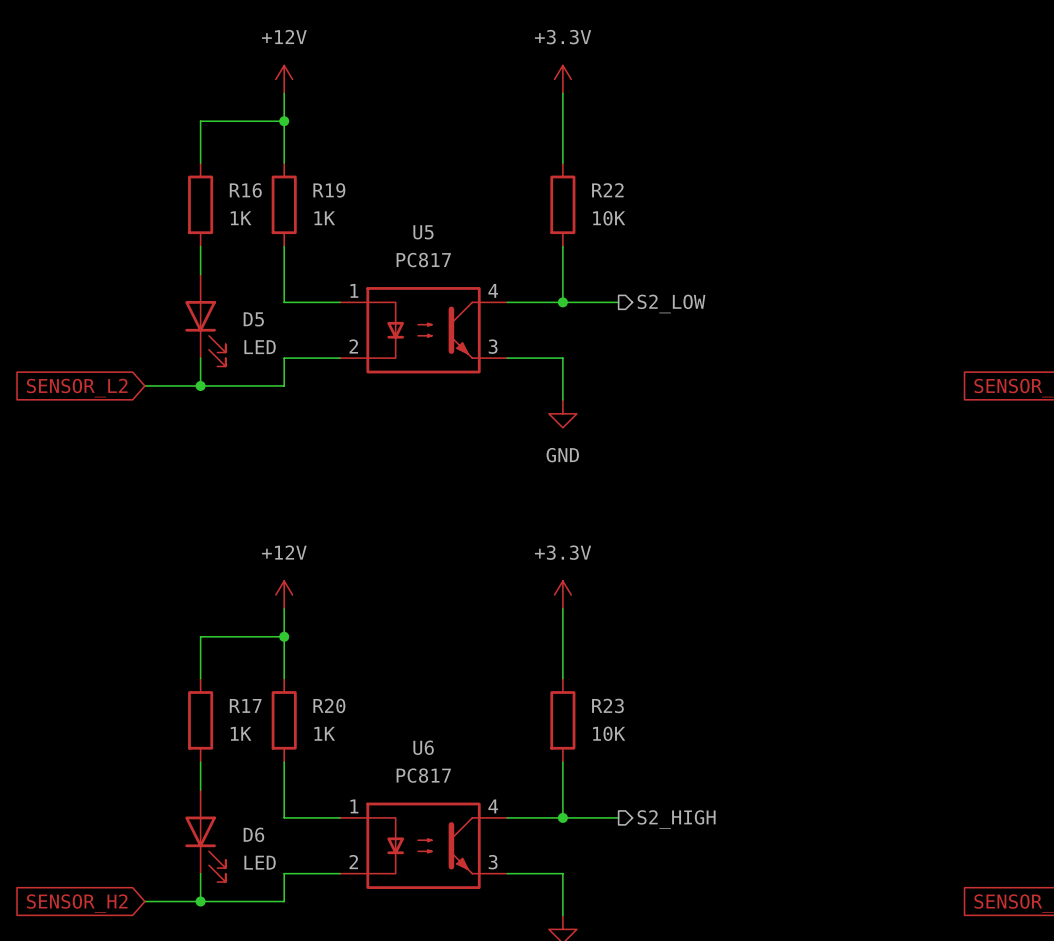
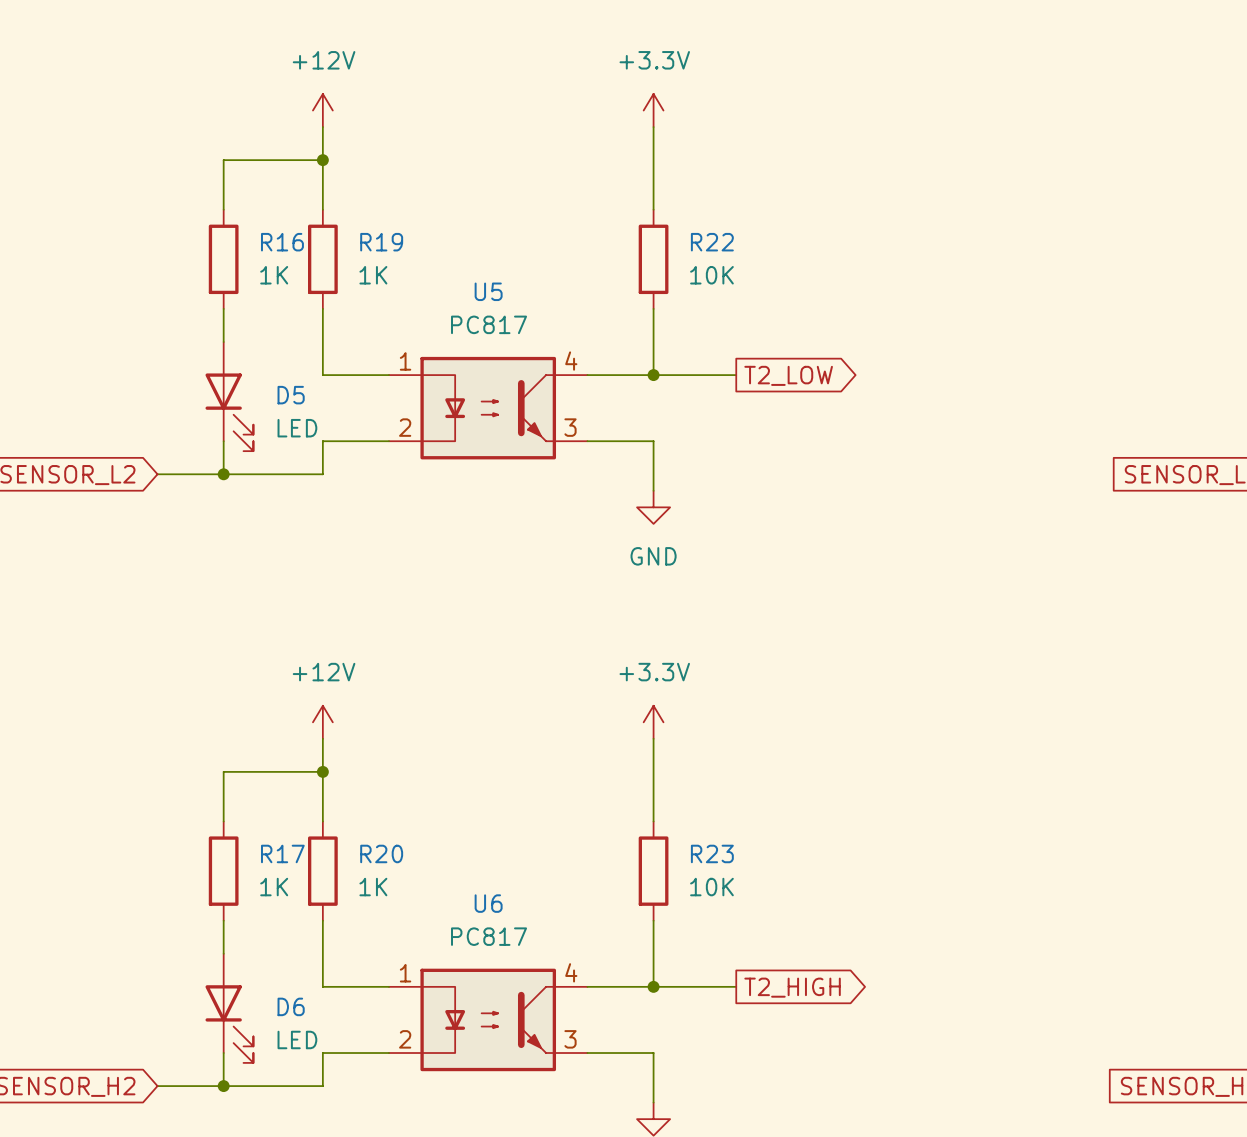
wire: none -> (719, 375) (736, 375)
hierarchical label: S2_LOW (671, 303) -> none
global label: none -> T2_LOW (788, 375)
wire: none -> (719, 986) (736, 986)
hierarchical label: S2_HIGH (676, 819) -> none
global label: none -> T2_HIGH (792, 987)

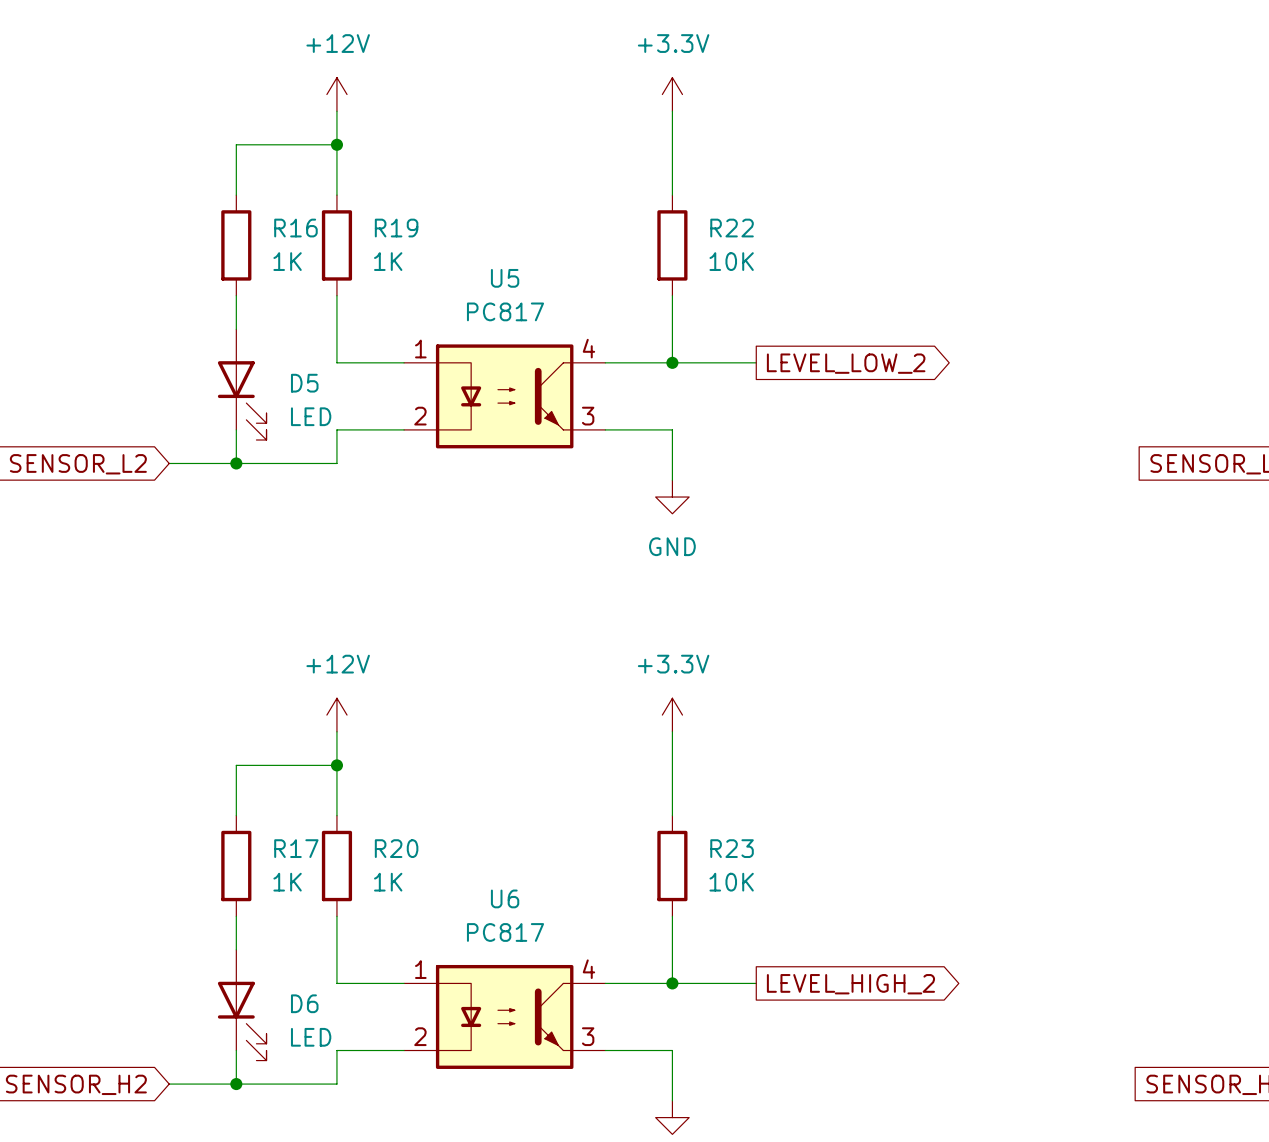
global label: T2_LOW (788, 375) -> LEVEL_LOW_2 (846, 363)
global label: T2_HIGH (792, 987) -> LEVEL_HIGH_2 (850, 984)

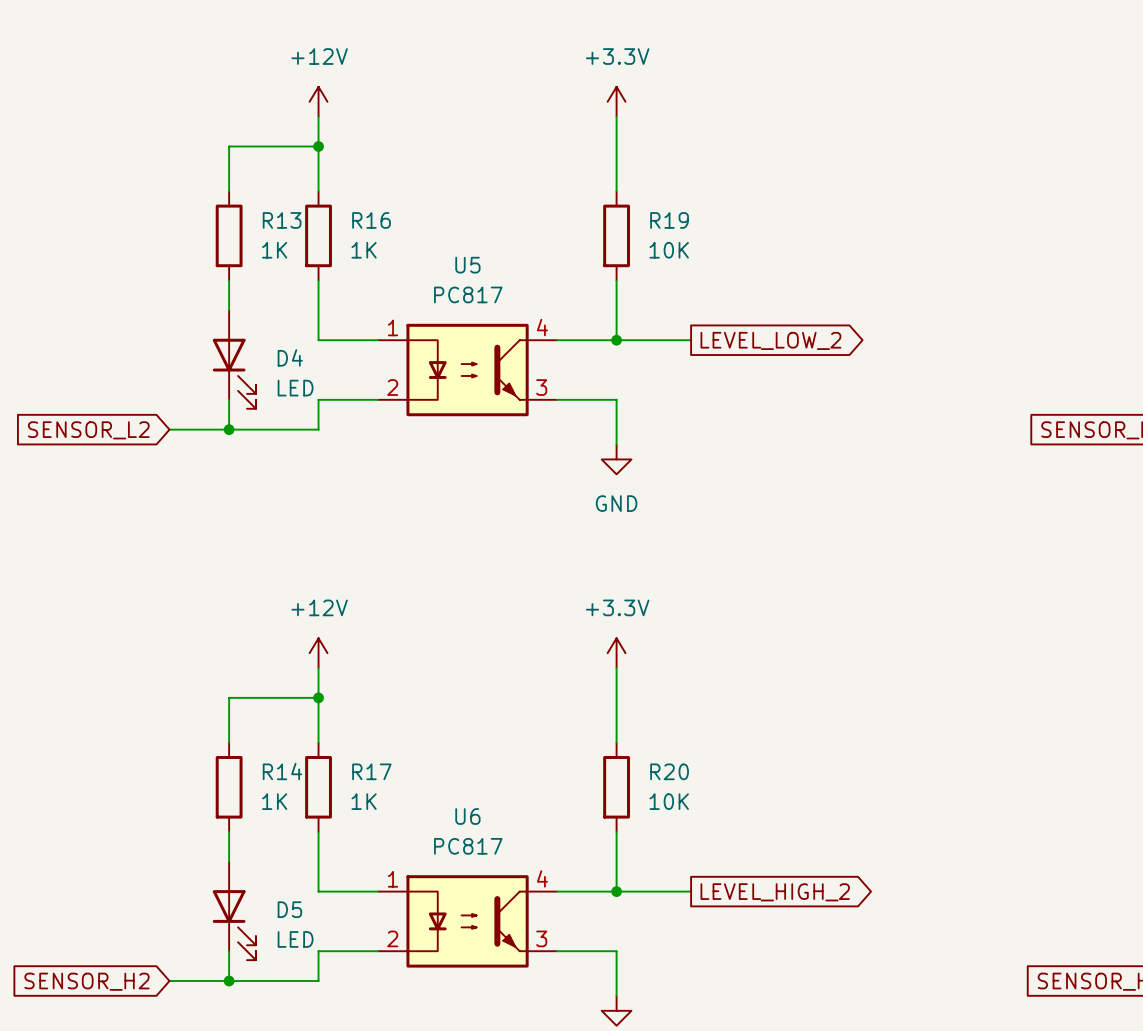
R16 name: R16 (295, 228) -> R13 (282, 220)
R19 name: R19 (396, 228) -> R16 (371, 220)
R22 name: R22 (732, 228) -> R19 (669, 220)
D5 name: D5 (304, 383) -> D4 (290, 357)
R17 name: R17 (296, 848) -> R14 (282, 771)
R20 name: R20 (396, 848) -> R17 (371, 771)
R23 name: R23 (732, 848) -> R20 (669, 771)
D6 name: D6 (304, 1003) -> D5 (289, 909)

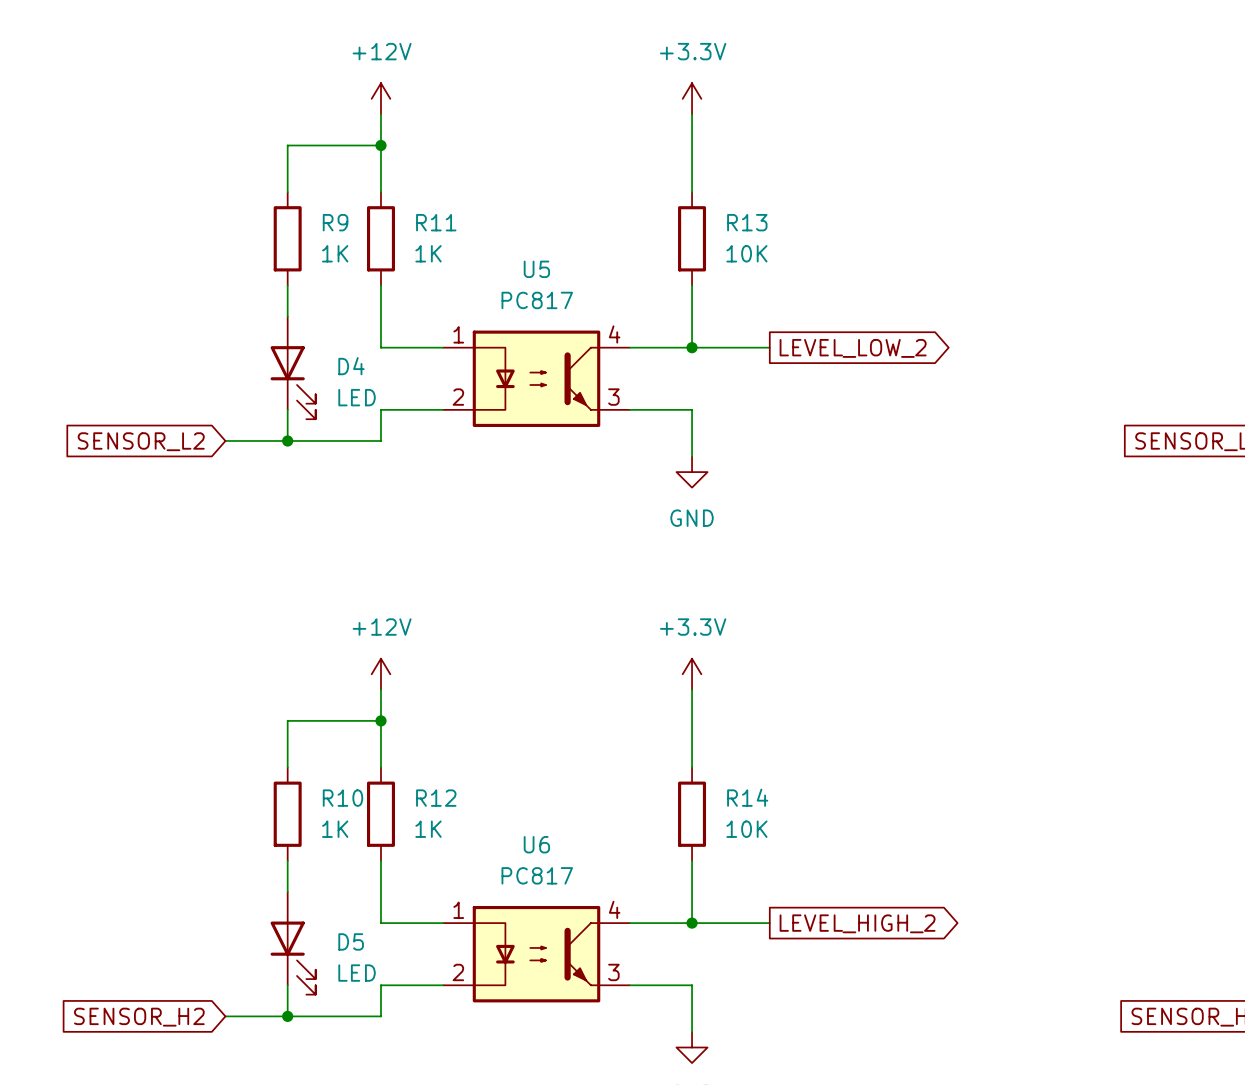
R13 name: R13 (282, 220) -> R9 (335, 222)
R16 name: R16 (371, 220) -> R11 (436, 222)
R19 name: R19 (669, 220) -> R13 (747, 222)
R14 name: R14 (282, 771) -> R10 (342, 798)
R17 name: R17 (371, 771) -> R12 (436, 798)
R20 name: R20 (669, 771) -> R14 (747, 797)

